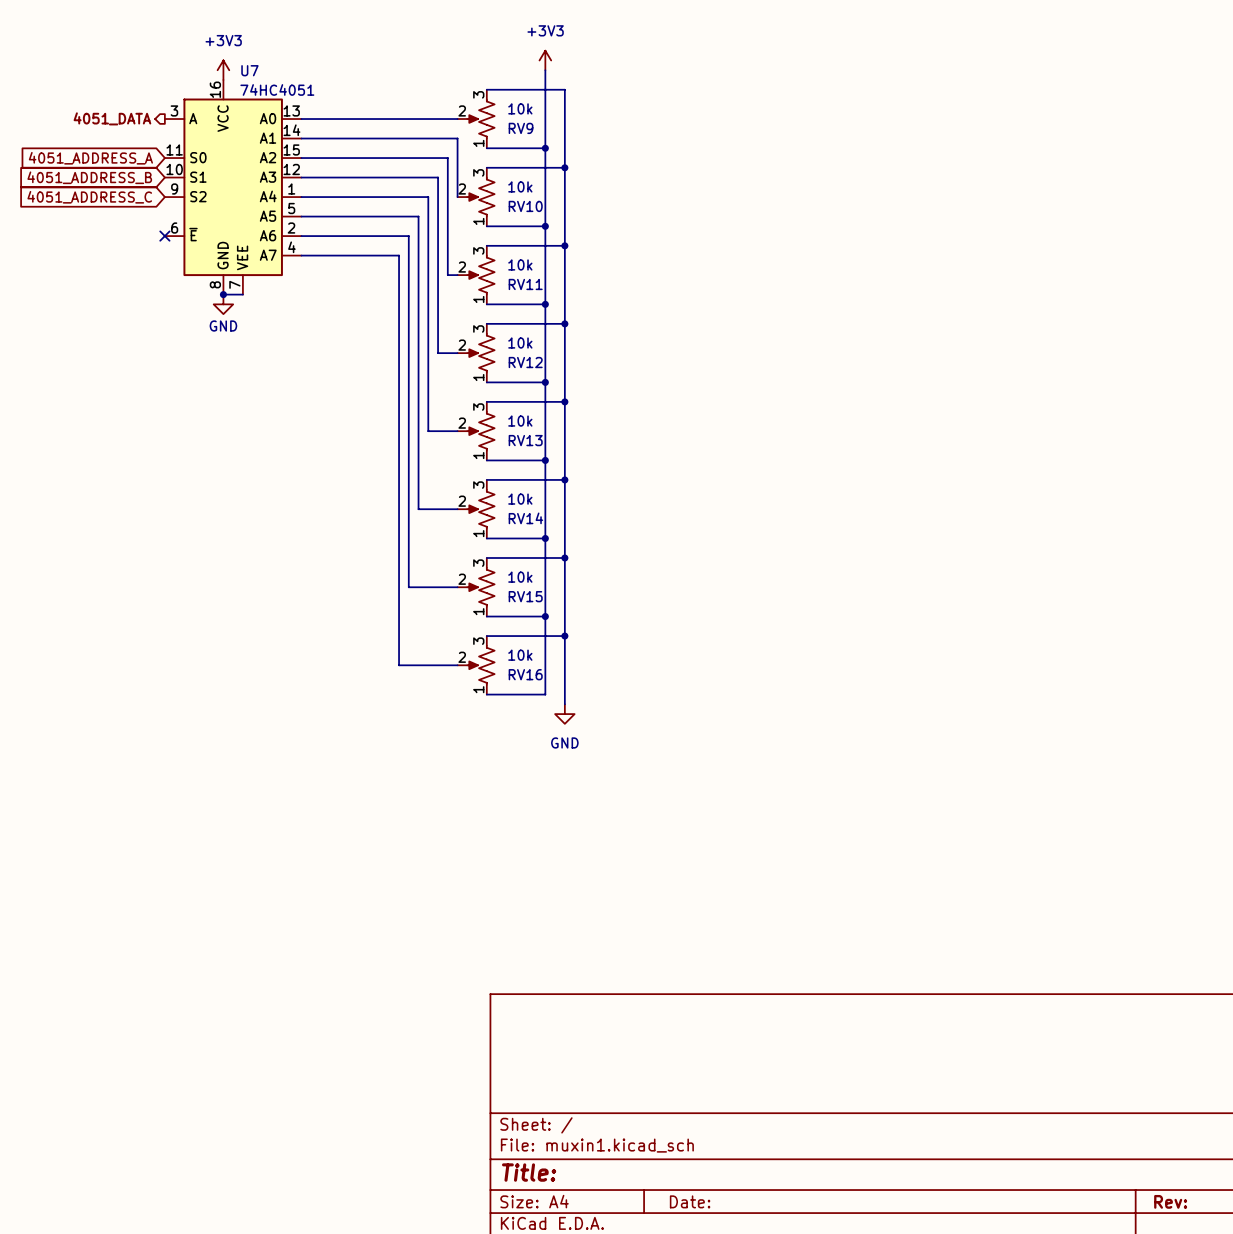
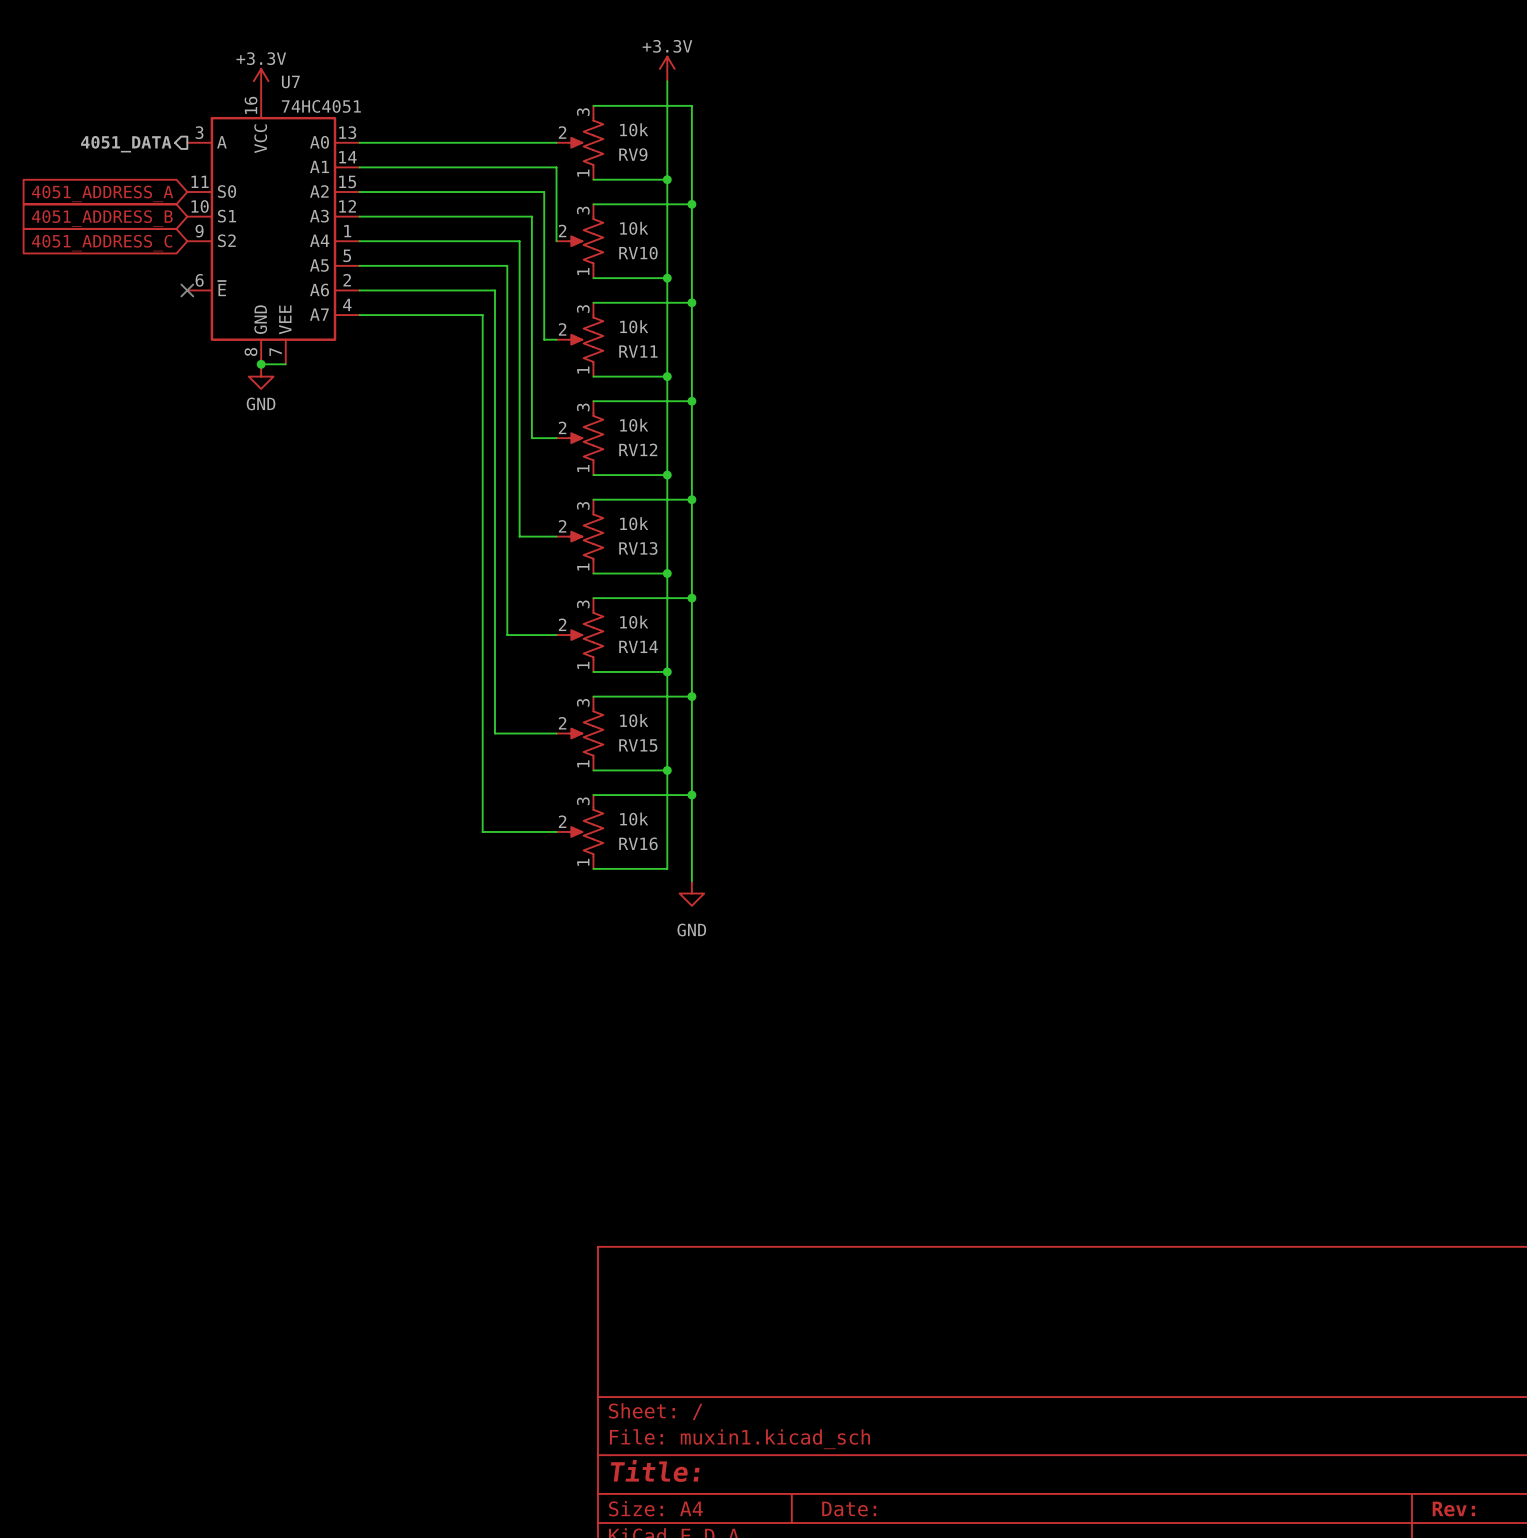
power symbol: +3V3 (545, 60) -> +3.3V (667, 68)
power symbol: +3V3 (223, 70) -> +3.3V (261, 81)

